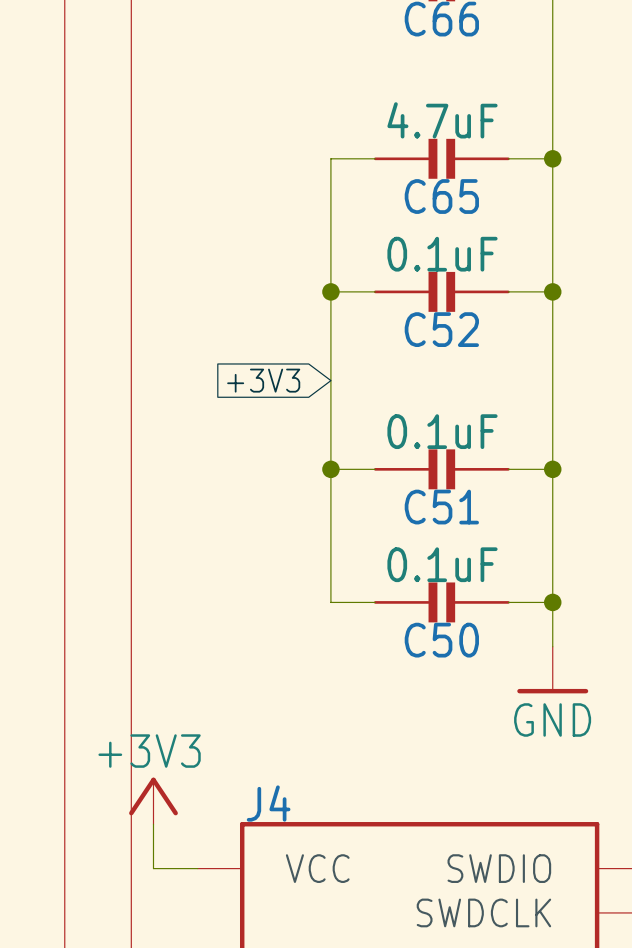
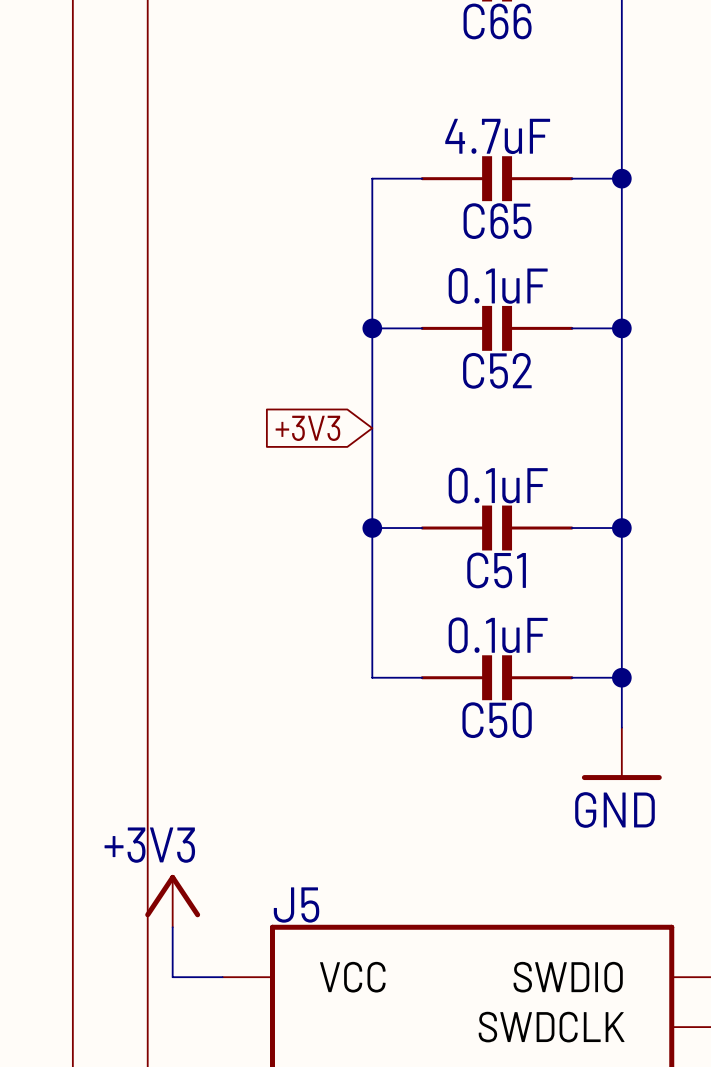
J4 name: J4 (268, 803) -> J5 (296, 905)

